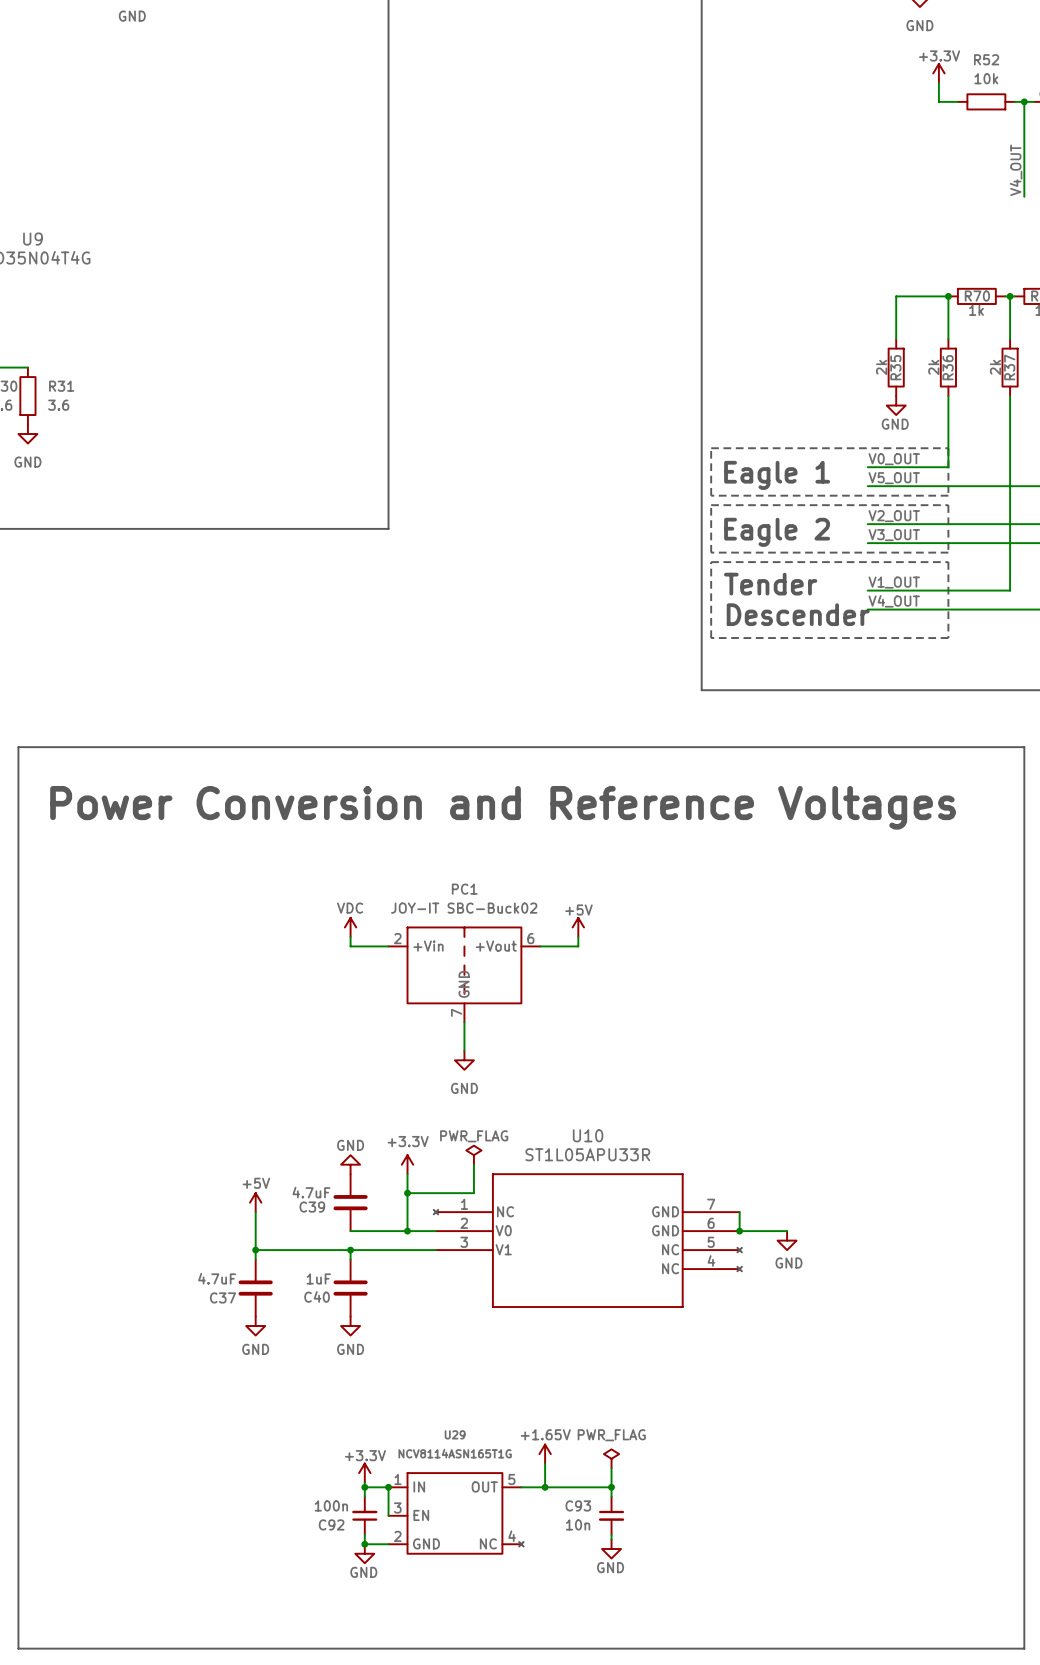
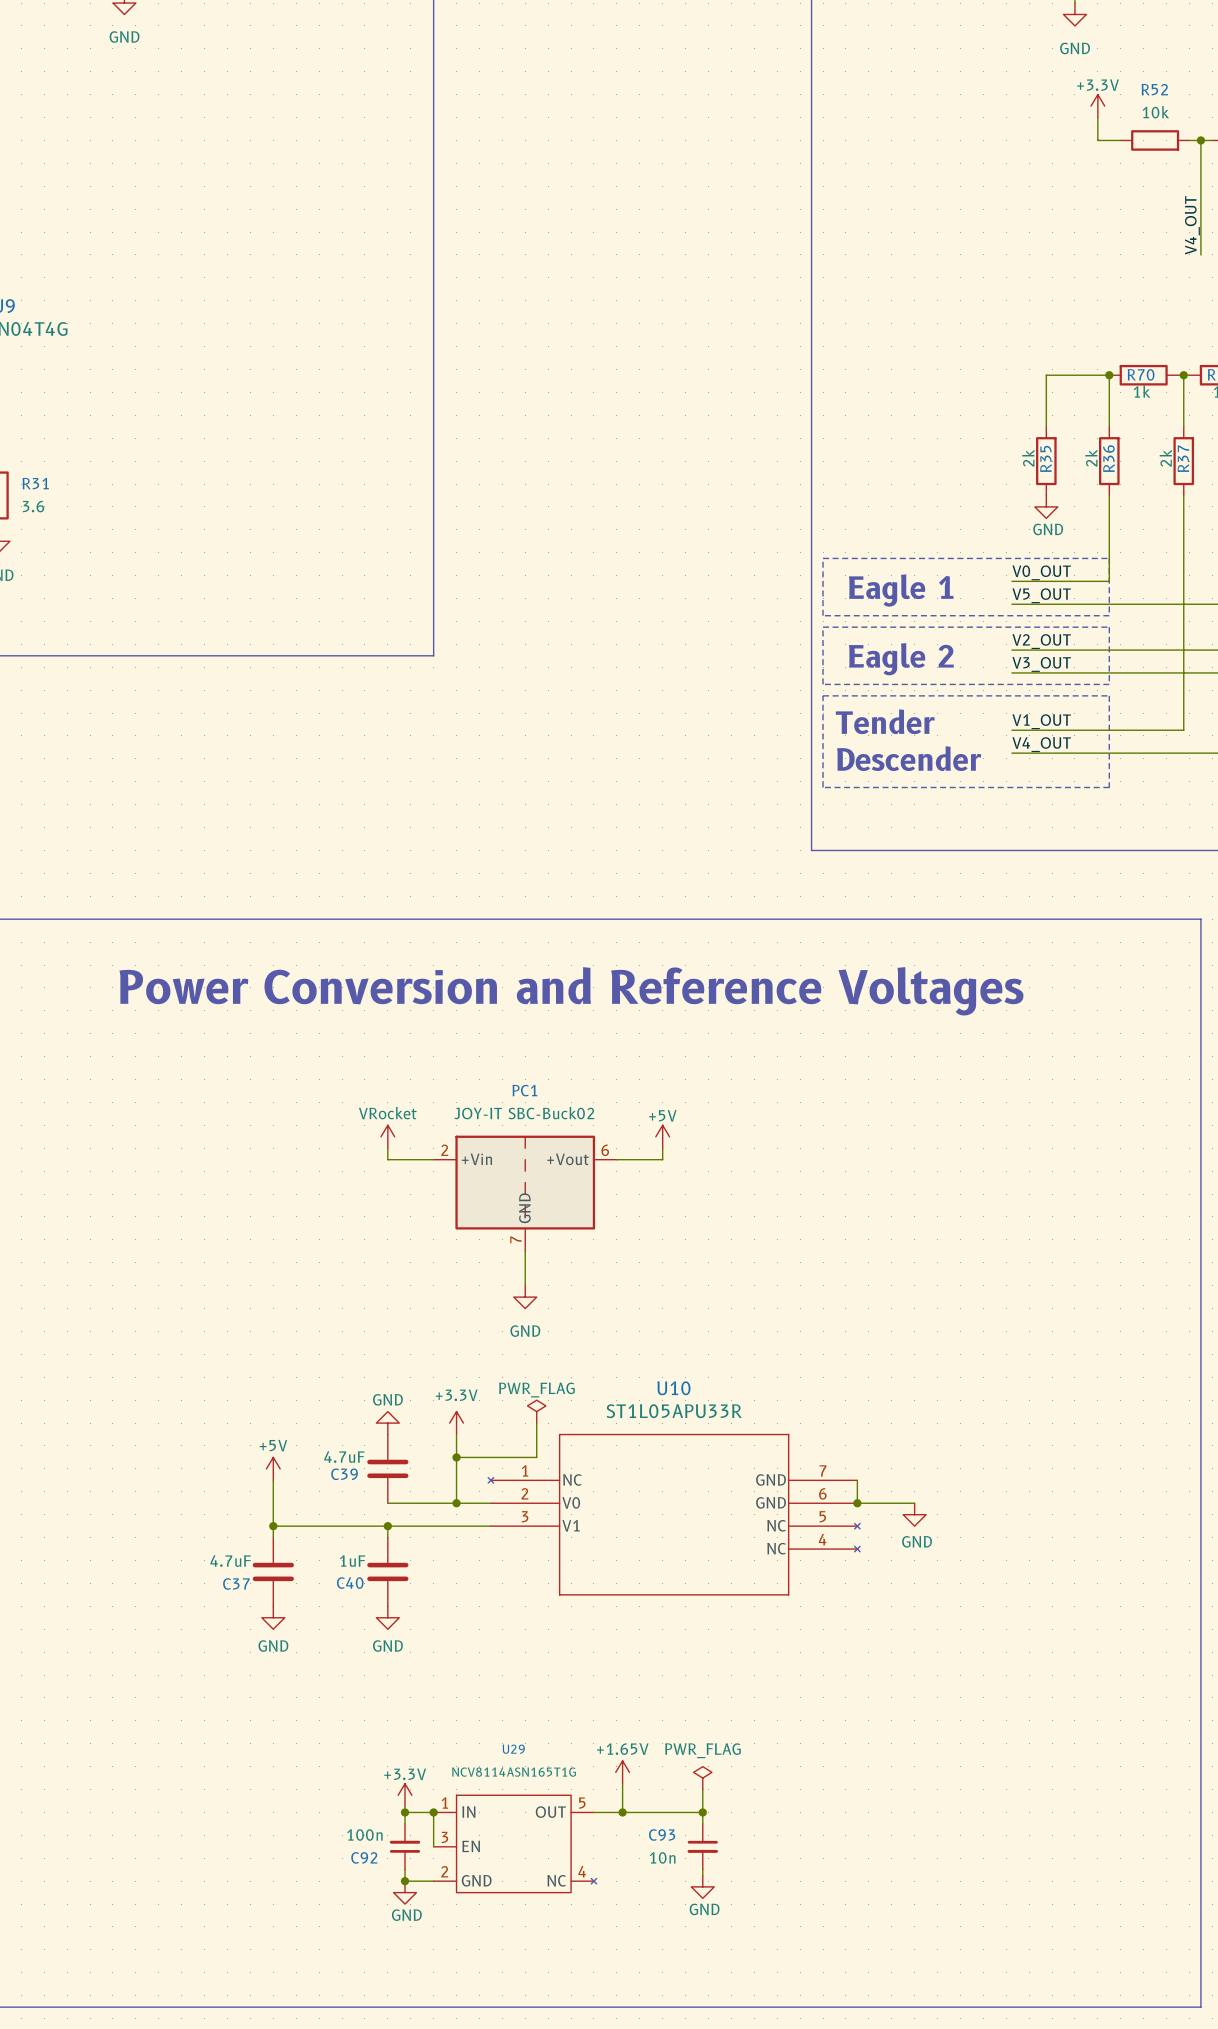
power symbol: VDC (350, 927) -> VRocket (387, 1136)

